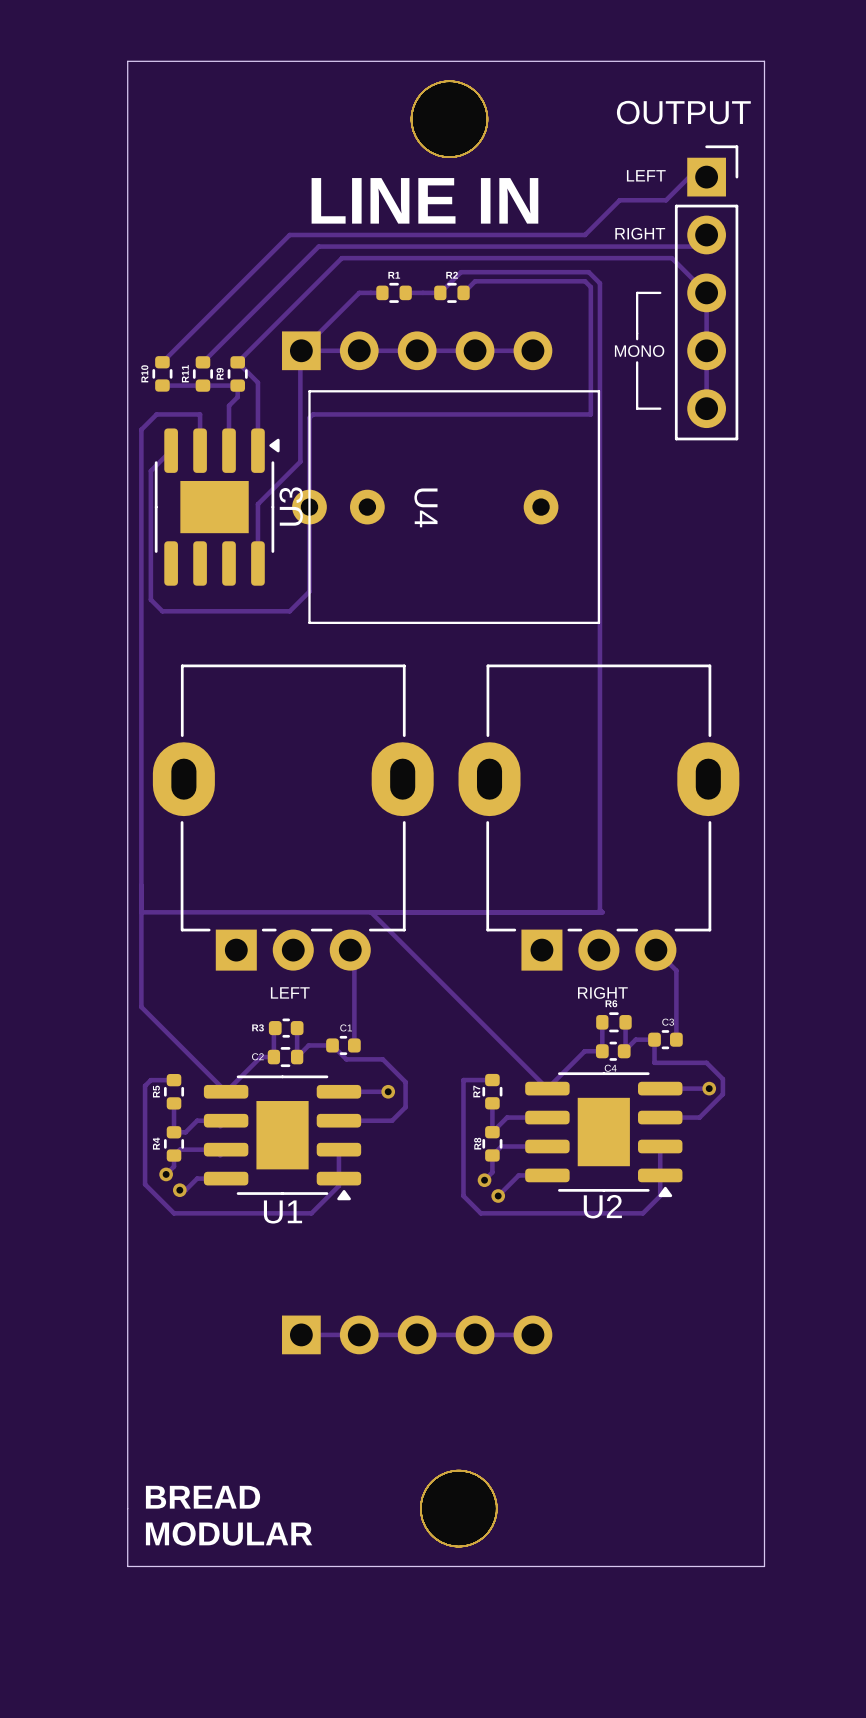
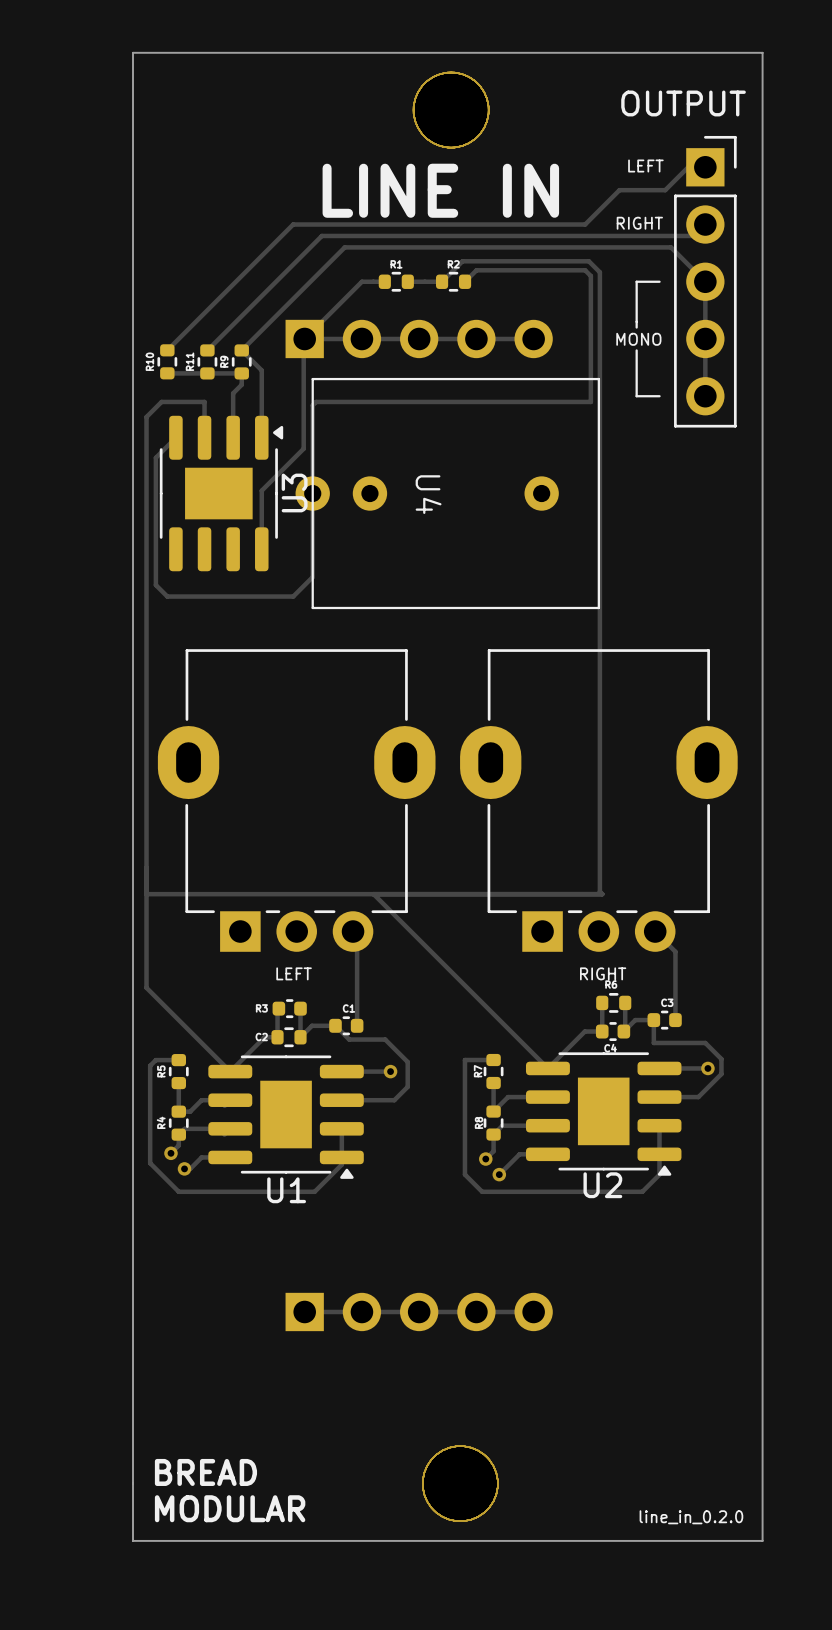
text: none -> line_in_0.2.0 (691, 1517)

